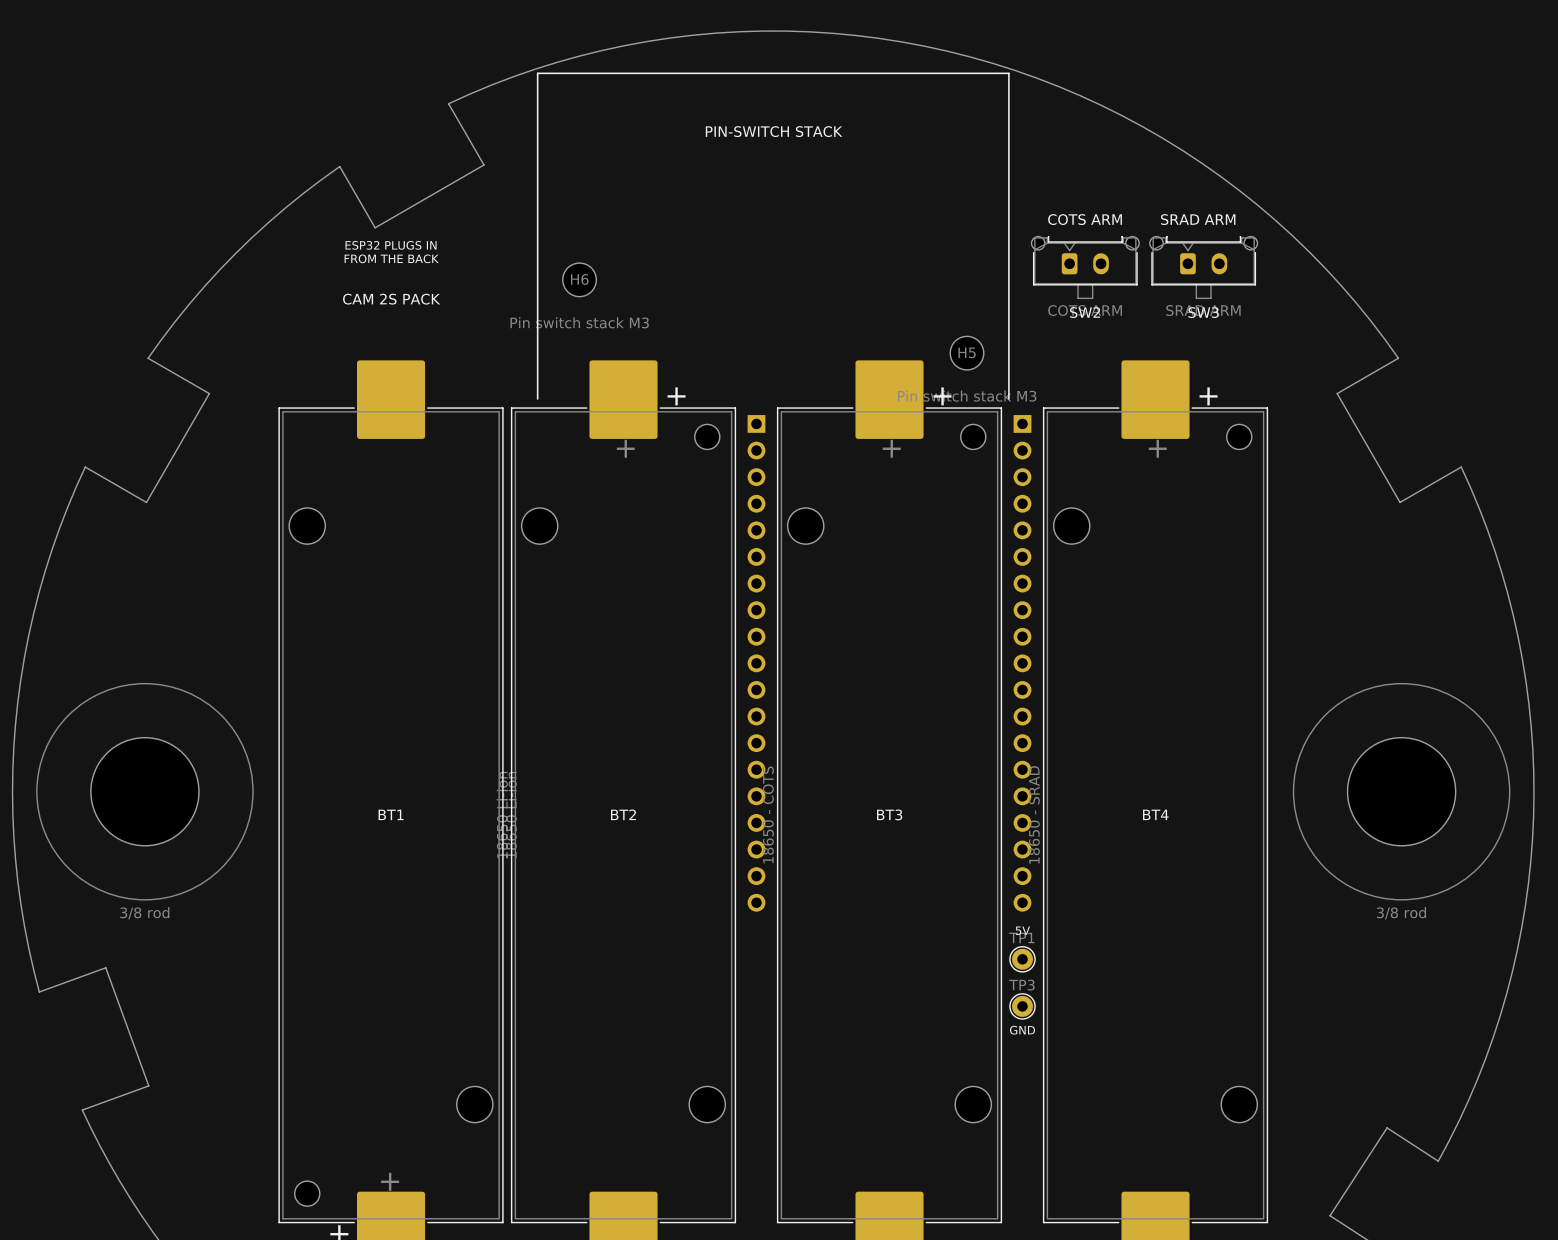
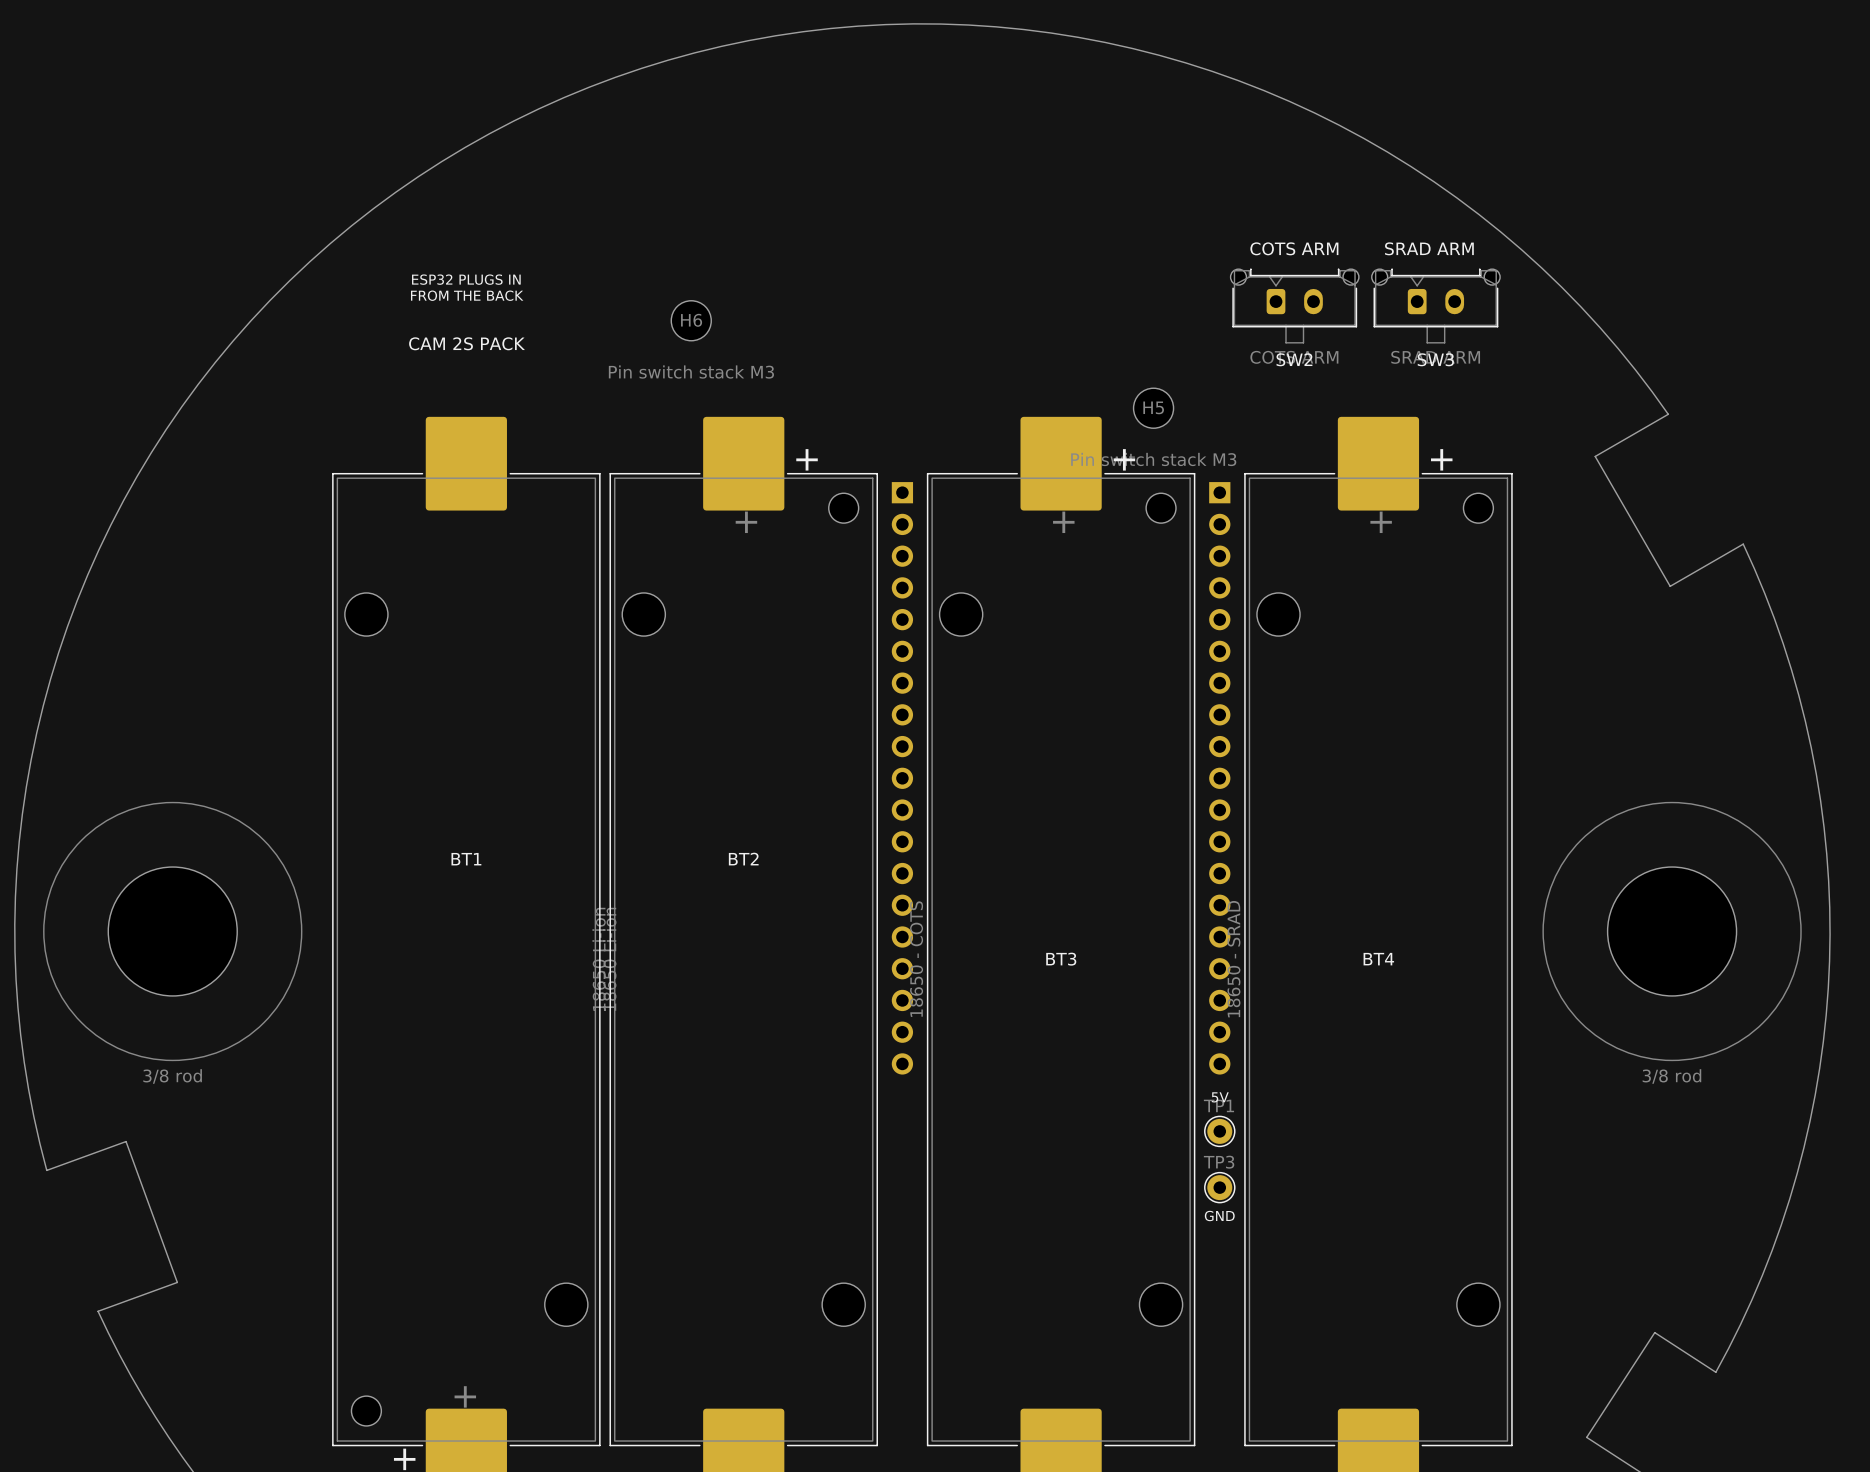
text: PIN-SWITCH STACK (774, 131) -> none
board edge: (1398, 358) (1356, 302) (1308, 251) (1257, 204) (1201, 162) (1142, 126) (1100, 105) (1036, 78) (970, 56) (902, 41) (832, 33) (786, 31) (716, 33) (647, 41) (579, 56) (512, 76) (448, 103) (483, 164) (375, 227) (339, 166) (321, 179) (285, 207) (235, 253) (189, 304) (148, 358) (209, 393) (146, 502) (85, 467) (59, 529) (38, 593) (24, 658) (15, 725) (12, 792) (15, 859) (24, 926) (39, 991) -> (1668, 414) (1617, 348) (1561, 287) (1500, 231) (1434, 181) (1387, 152) (1314, 112) (1238, 80) (1159, 55) (1078, 37) (996, 26) (913, 23) (858, 26) (775, 35) (694, 52) (615, 77) (538, 108) (465, 147) (395, 192) (330, 243) (270, 300) (215, 362) (166, 429) (123, 500) (98, 549) (77, 600) (50, 679) (31, 759) (19, 841) (14, 924) (17, 1007) (28, 1089) (46, 1170)
line: (537, 399) (537, 73) (1008, 73) (1008, 399) -> none
BT1 name position: BT1 (391, 814) -> BT1 (466, 859)
BT2 name position: BT2 (623, 814) -> BT2 (743, 859)

